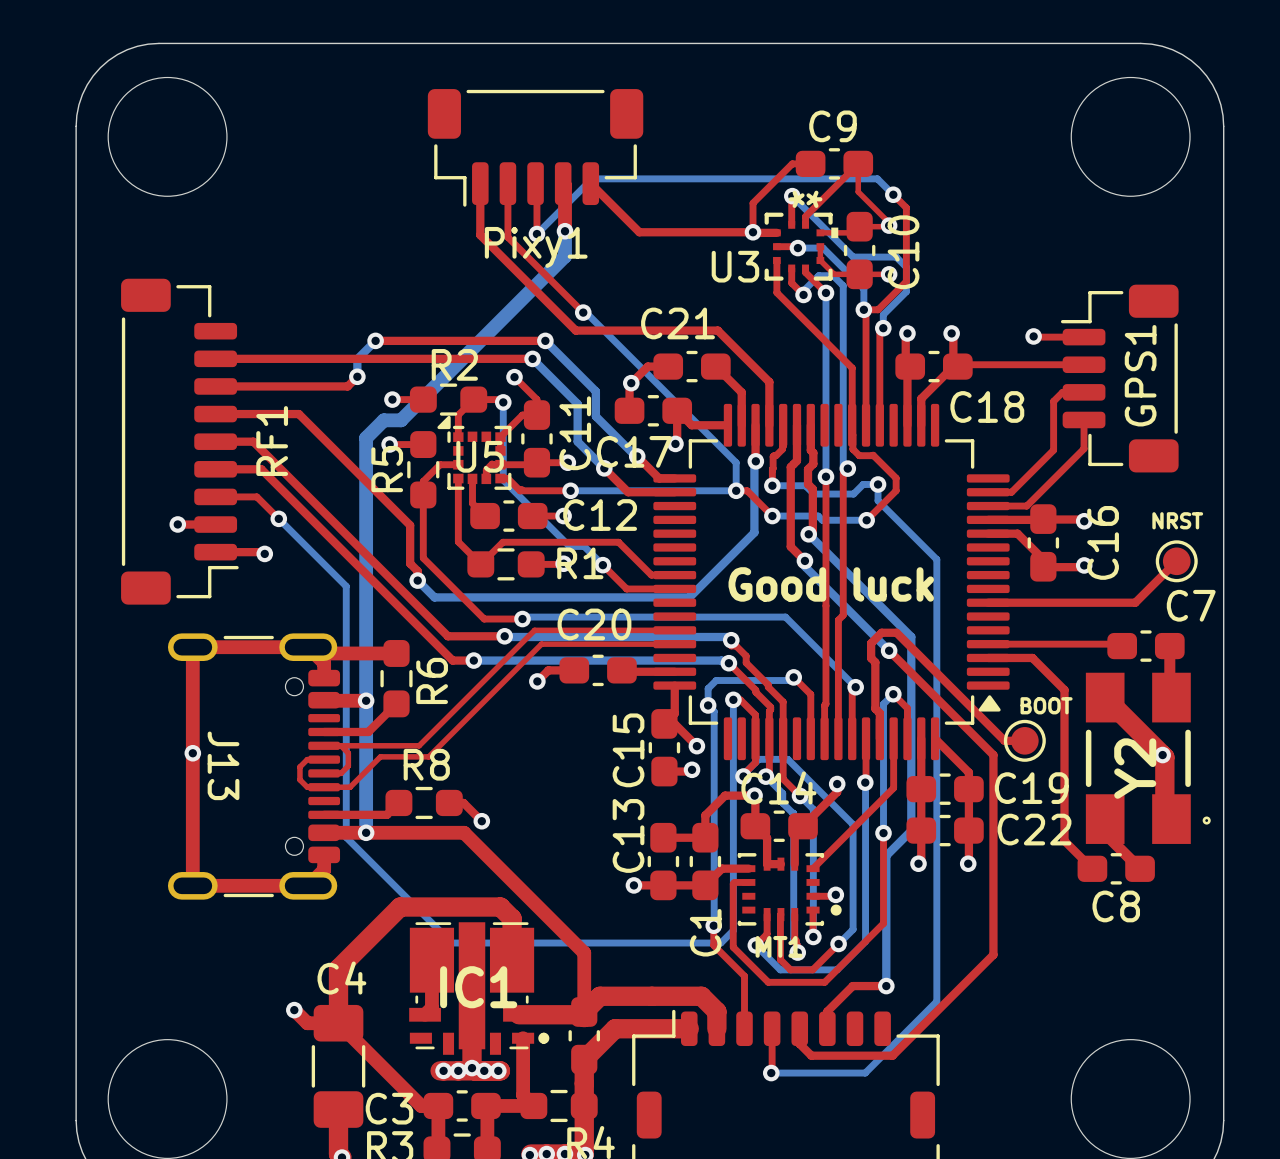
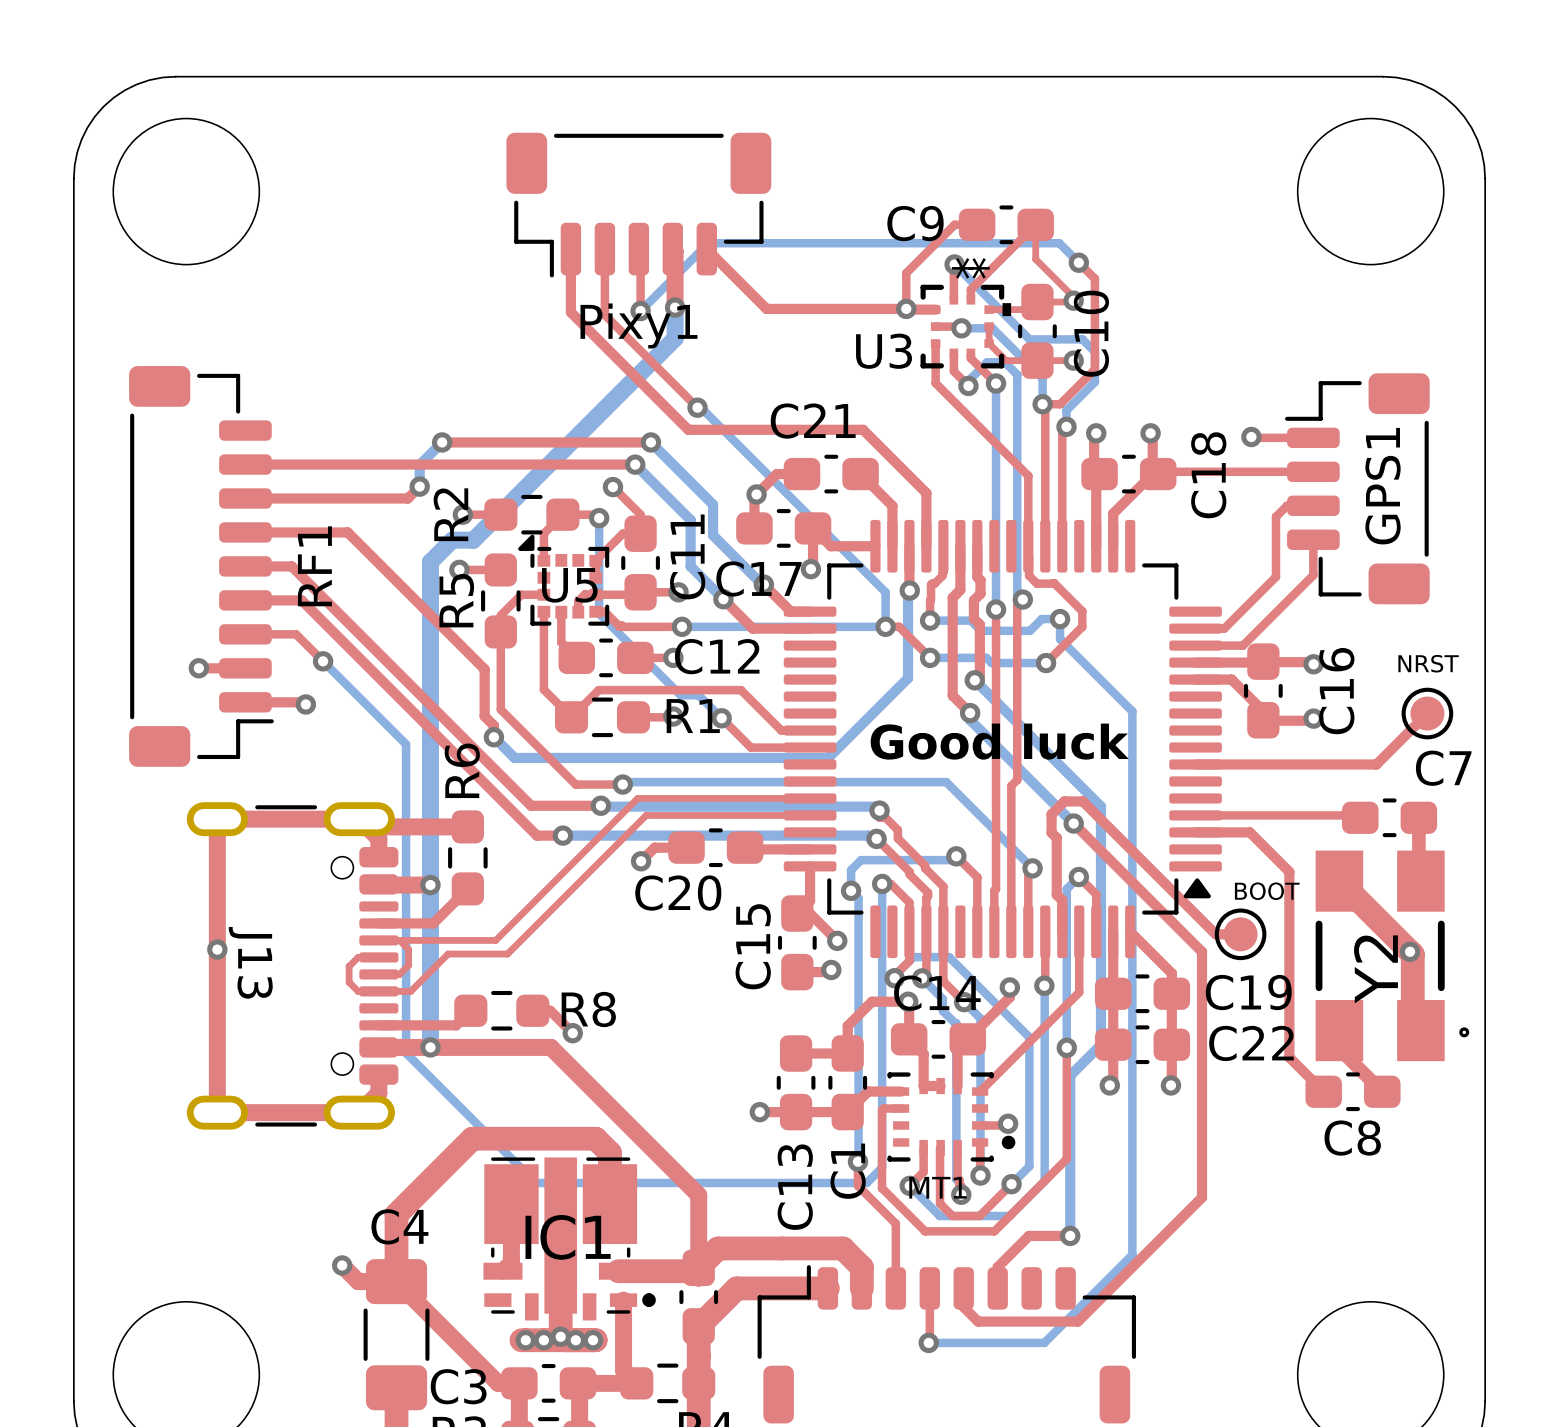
C9 name position: C9 (833, 126) -> C9 (915, 223)
R2 name rotation: 0° (454, 364) -> 90° counterclockwise (450, 514)
R2 name position: R2 (454, 364) -> R2 (450, 514)
C18 name rotation: 0° (987, 406) -> 90° counterclockwise (1208, 475)
C20 name position: C20 (594, 624) -> C20 (678, 893)
R6 name position: R6 (432, 680) -> R6 (462, 770)
R8 name position: R8 (426, 764) -> R8 (588, 1009)
C13 name position: C13 (628, 835) -> C13 (795, 1187)

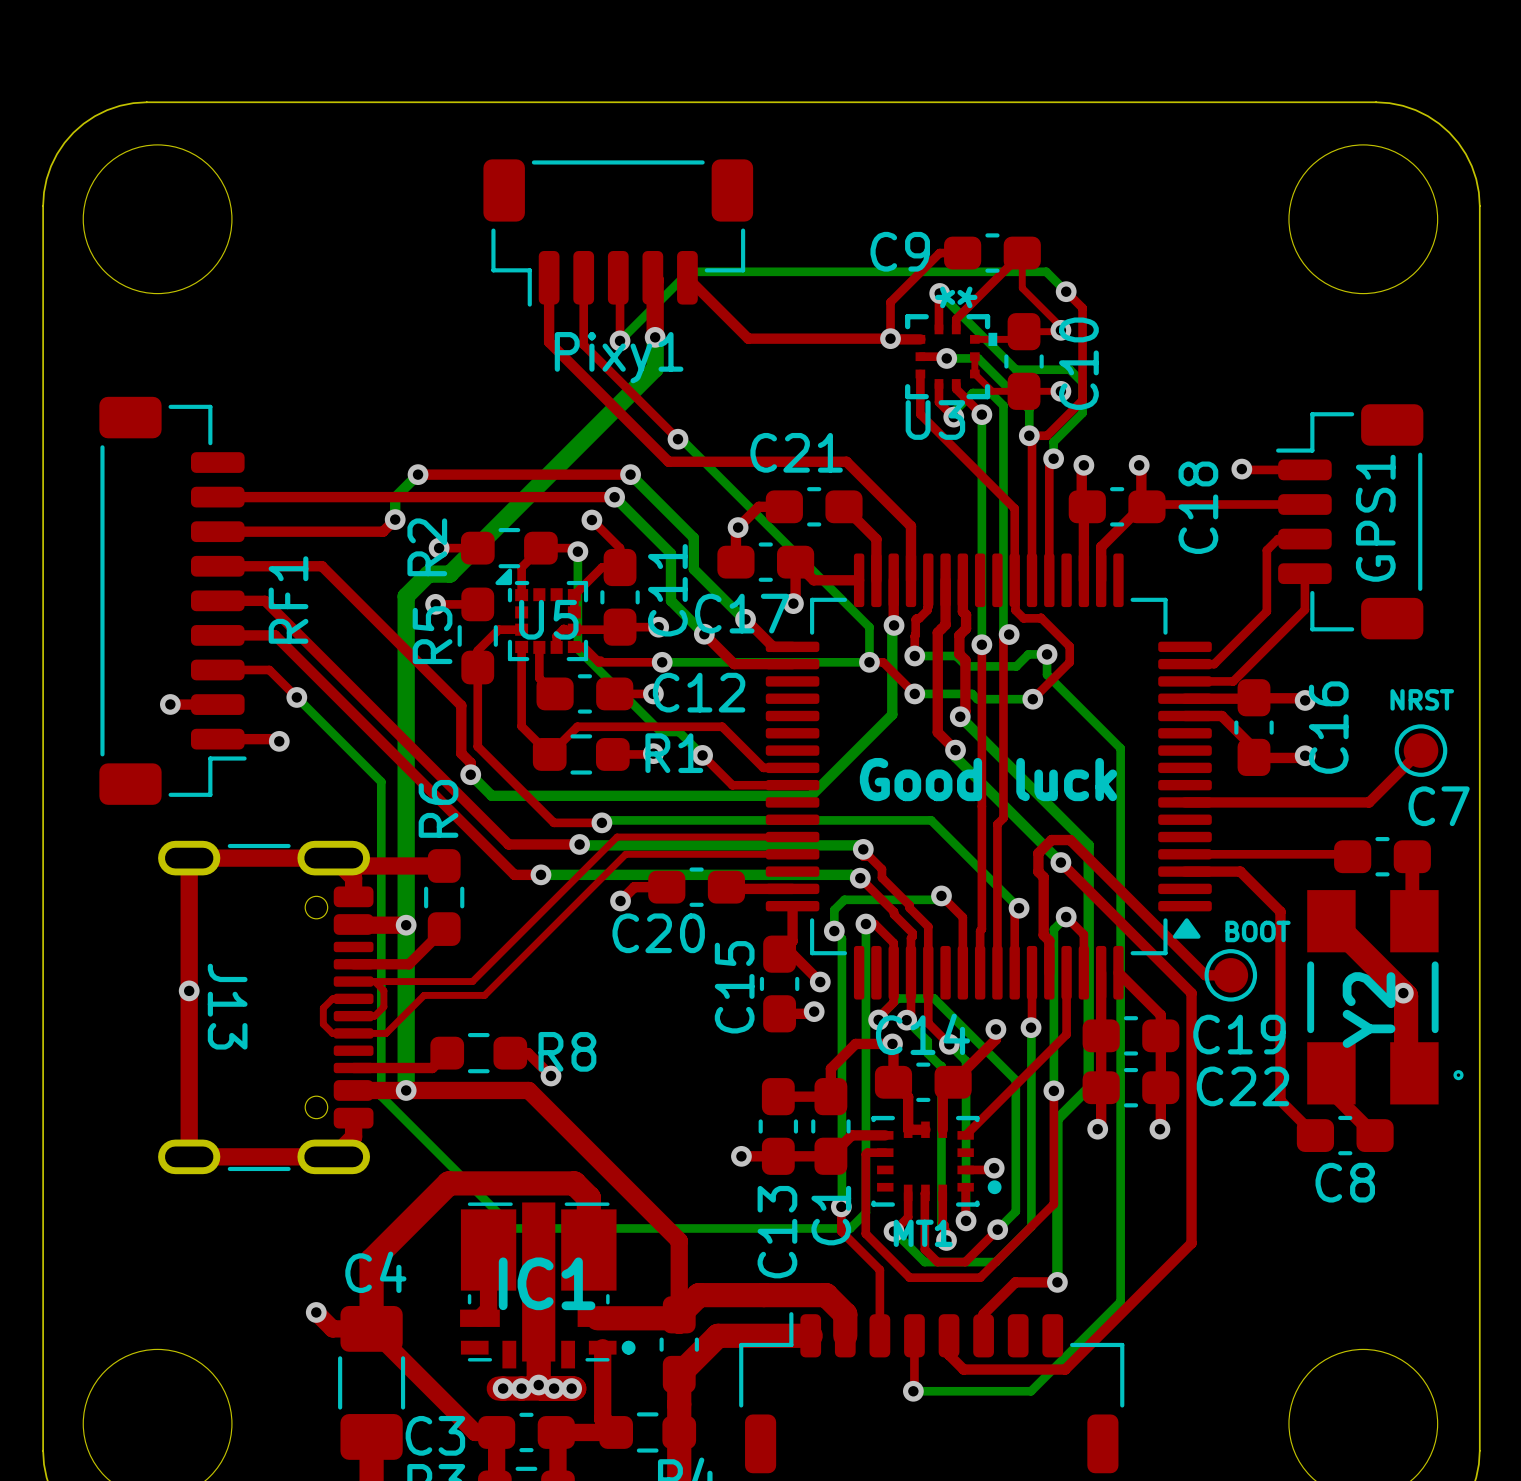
U3 name position: U3 (884, 351) -> U3 (935, 420)

